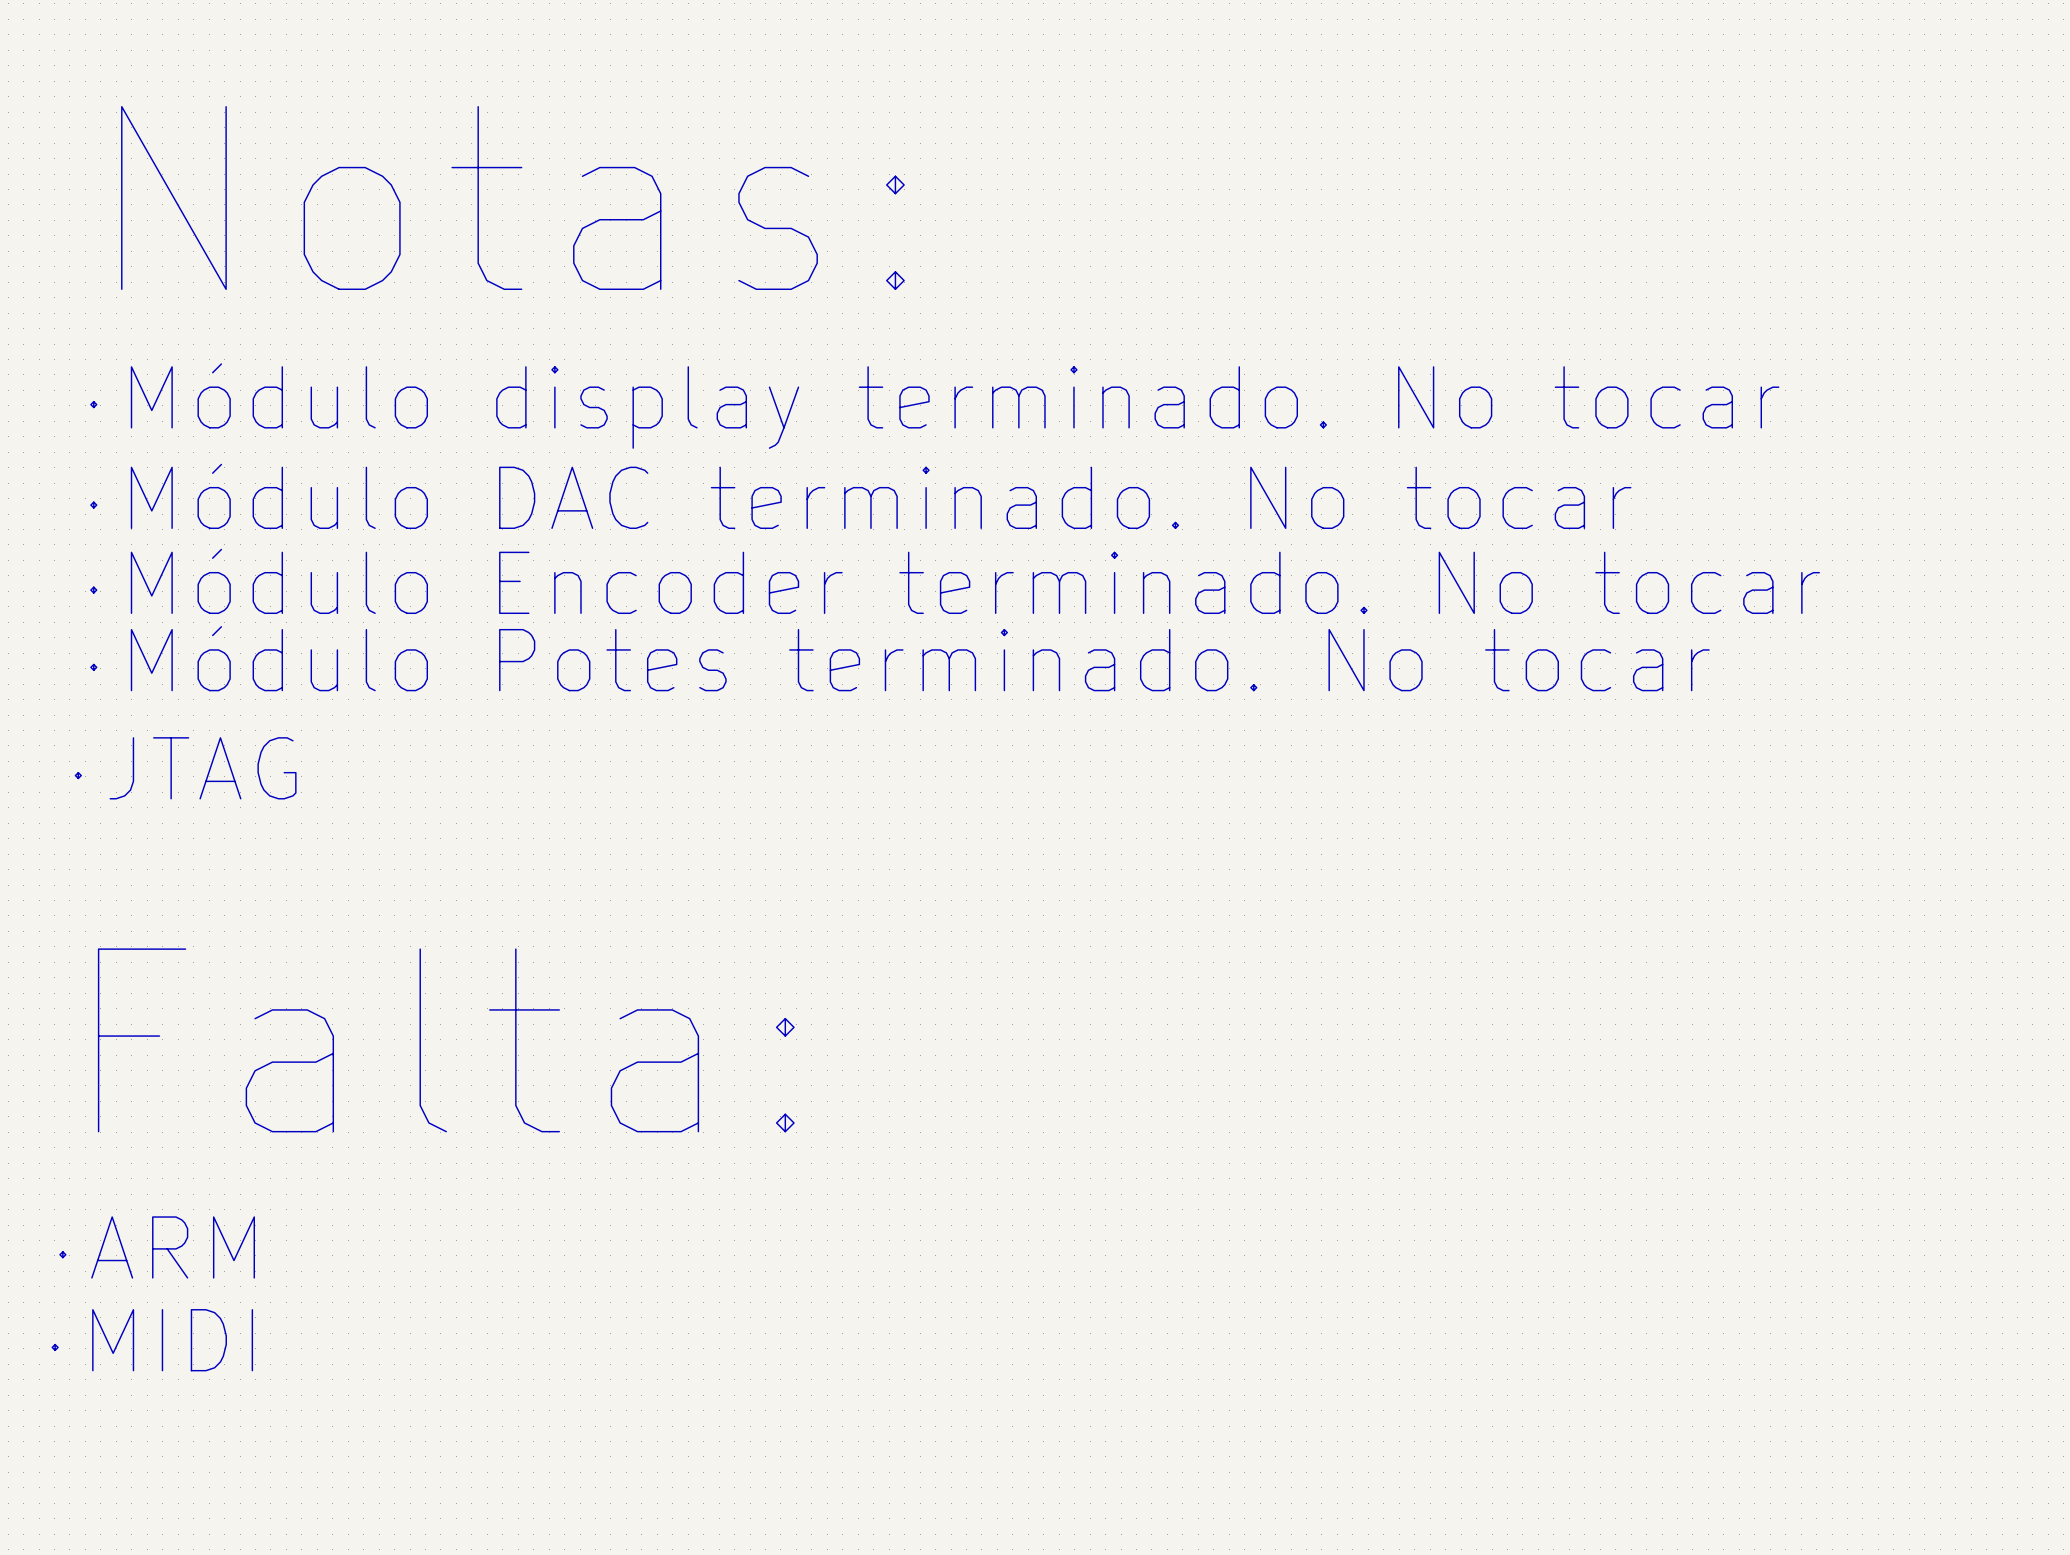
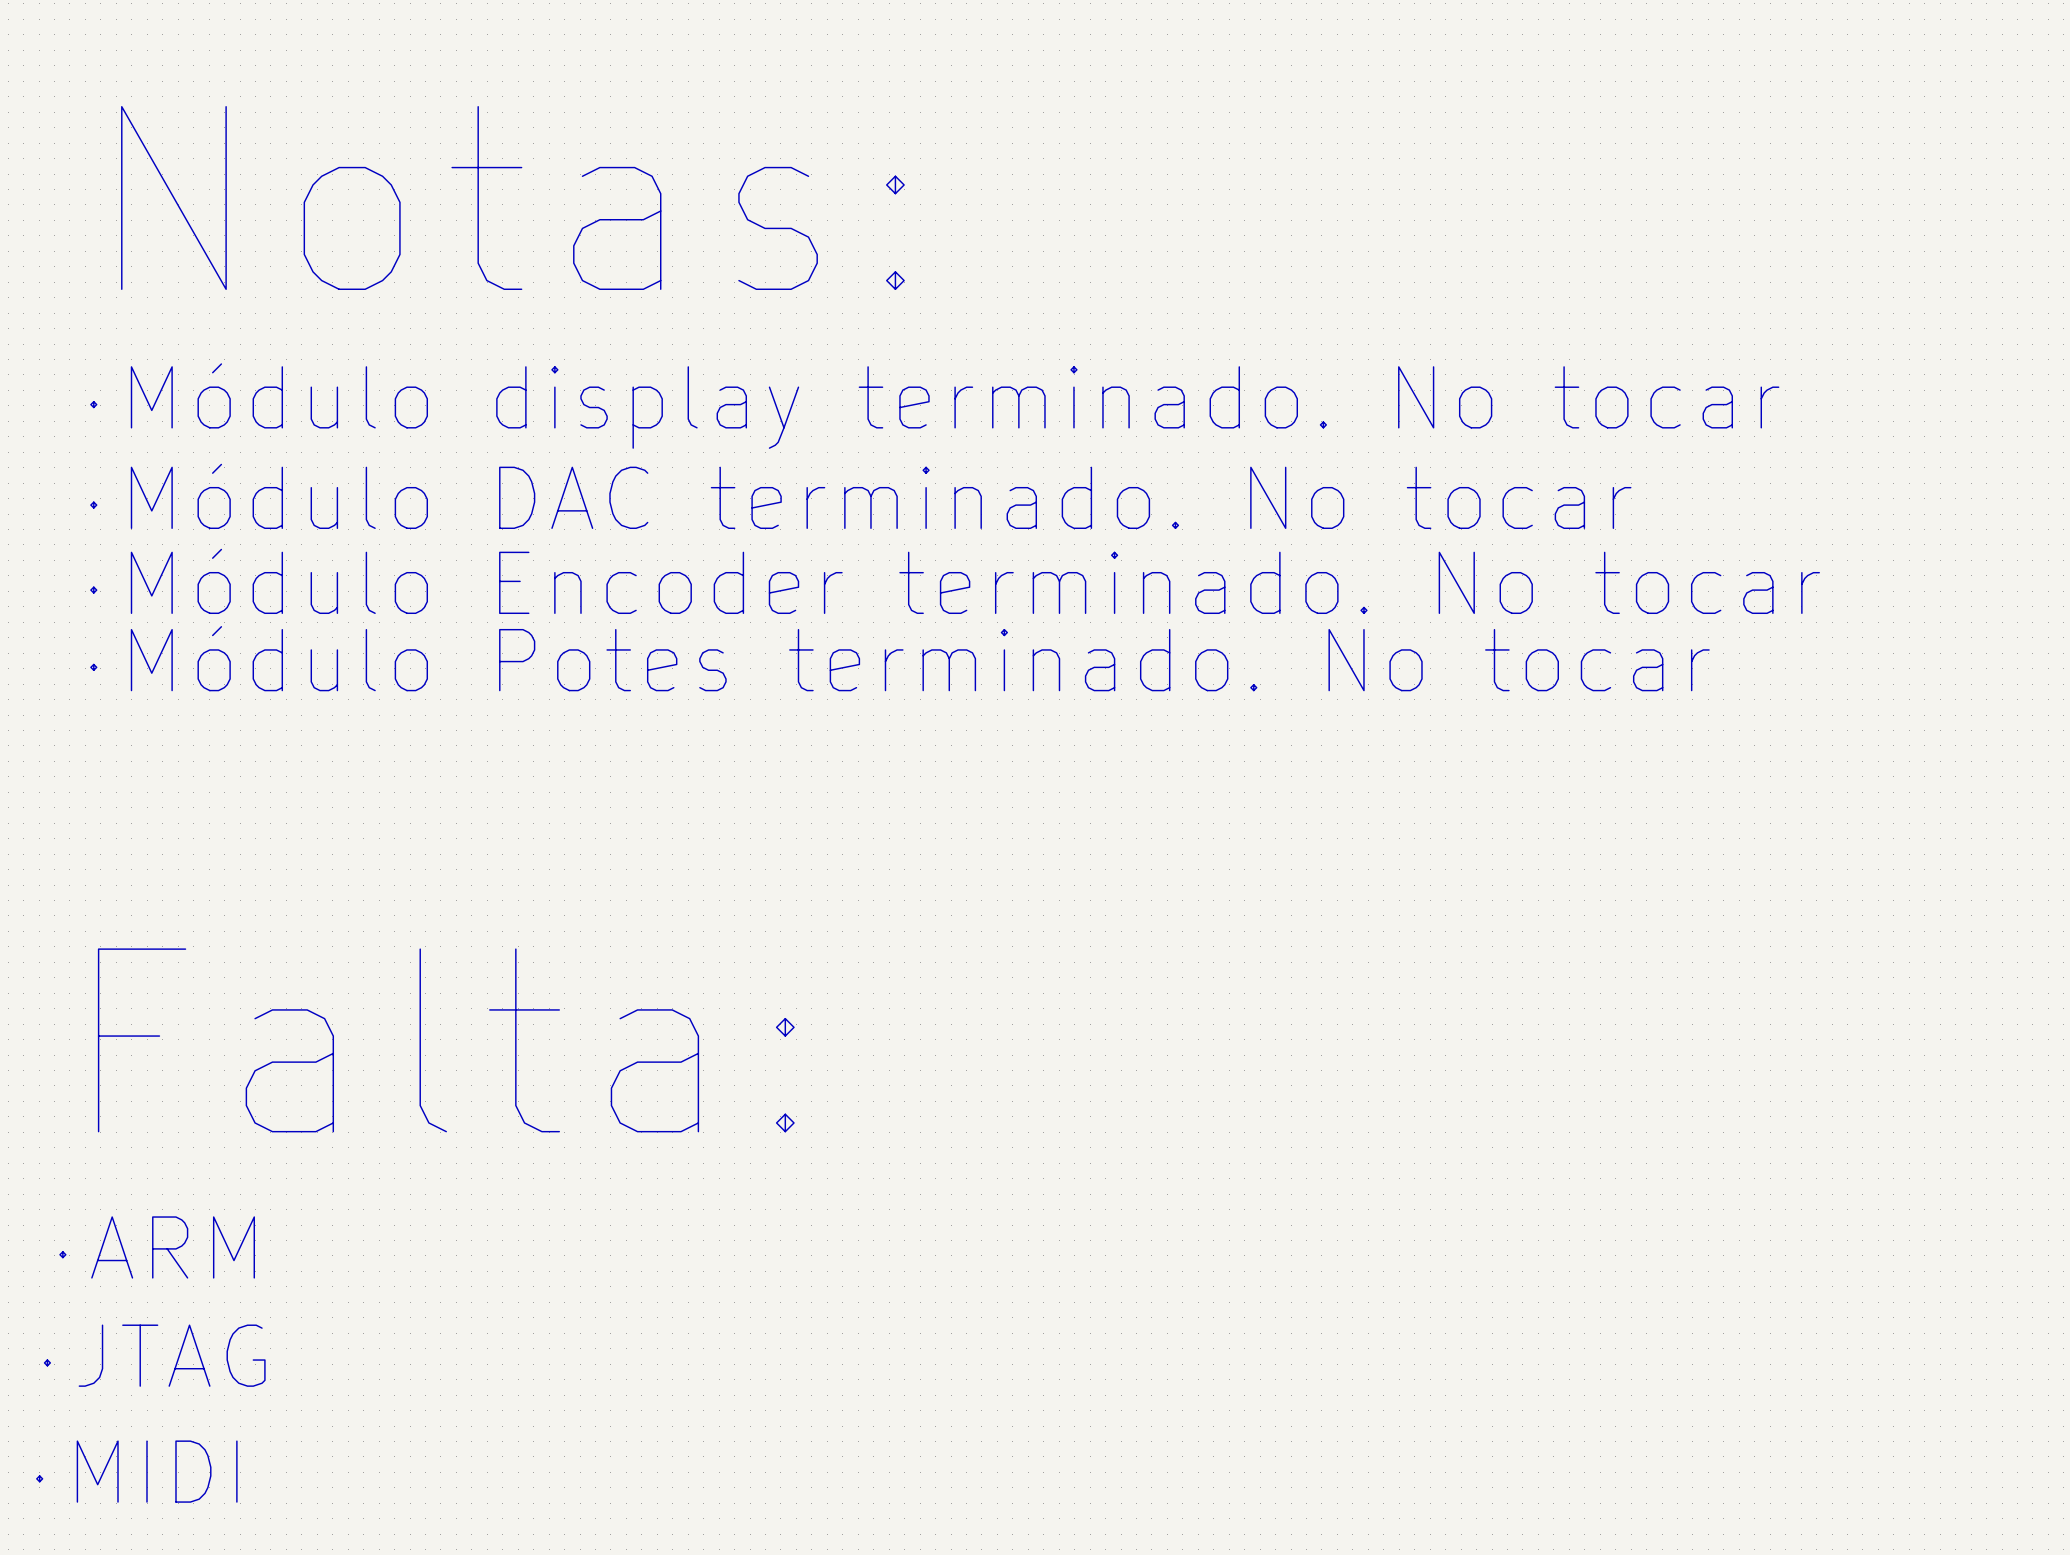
text: ·JTAG (185, 768) -> none
text position: ·MIDI (152, 1340) -> ·MIDI (136, 1471)
text: none -> ·JTAG (154, 1355)

